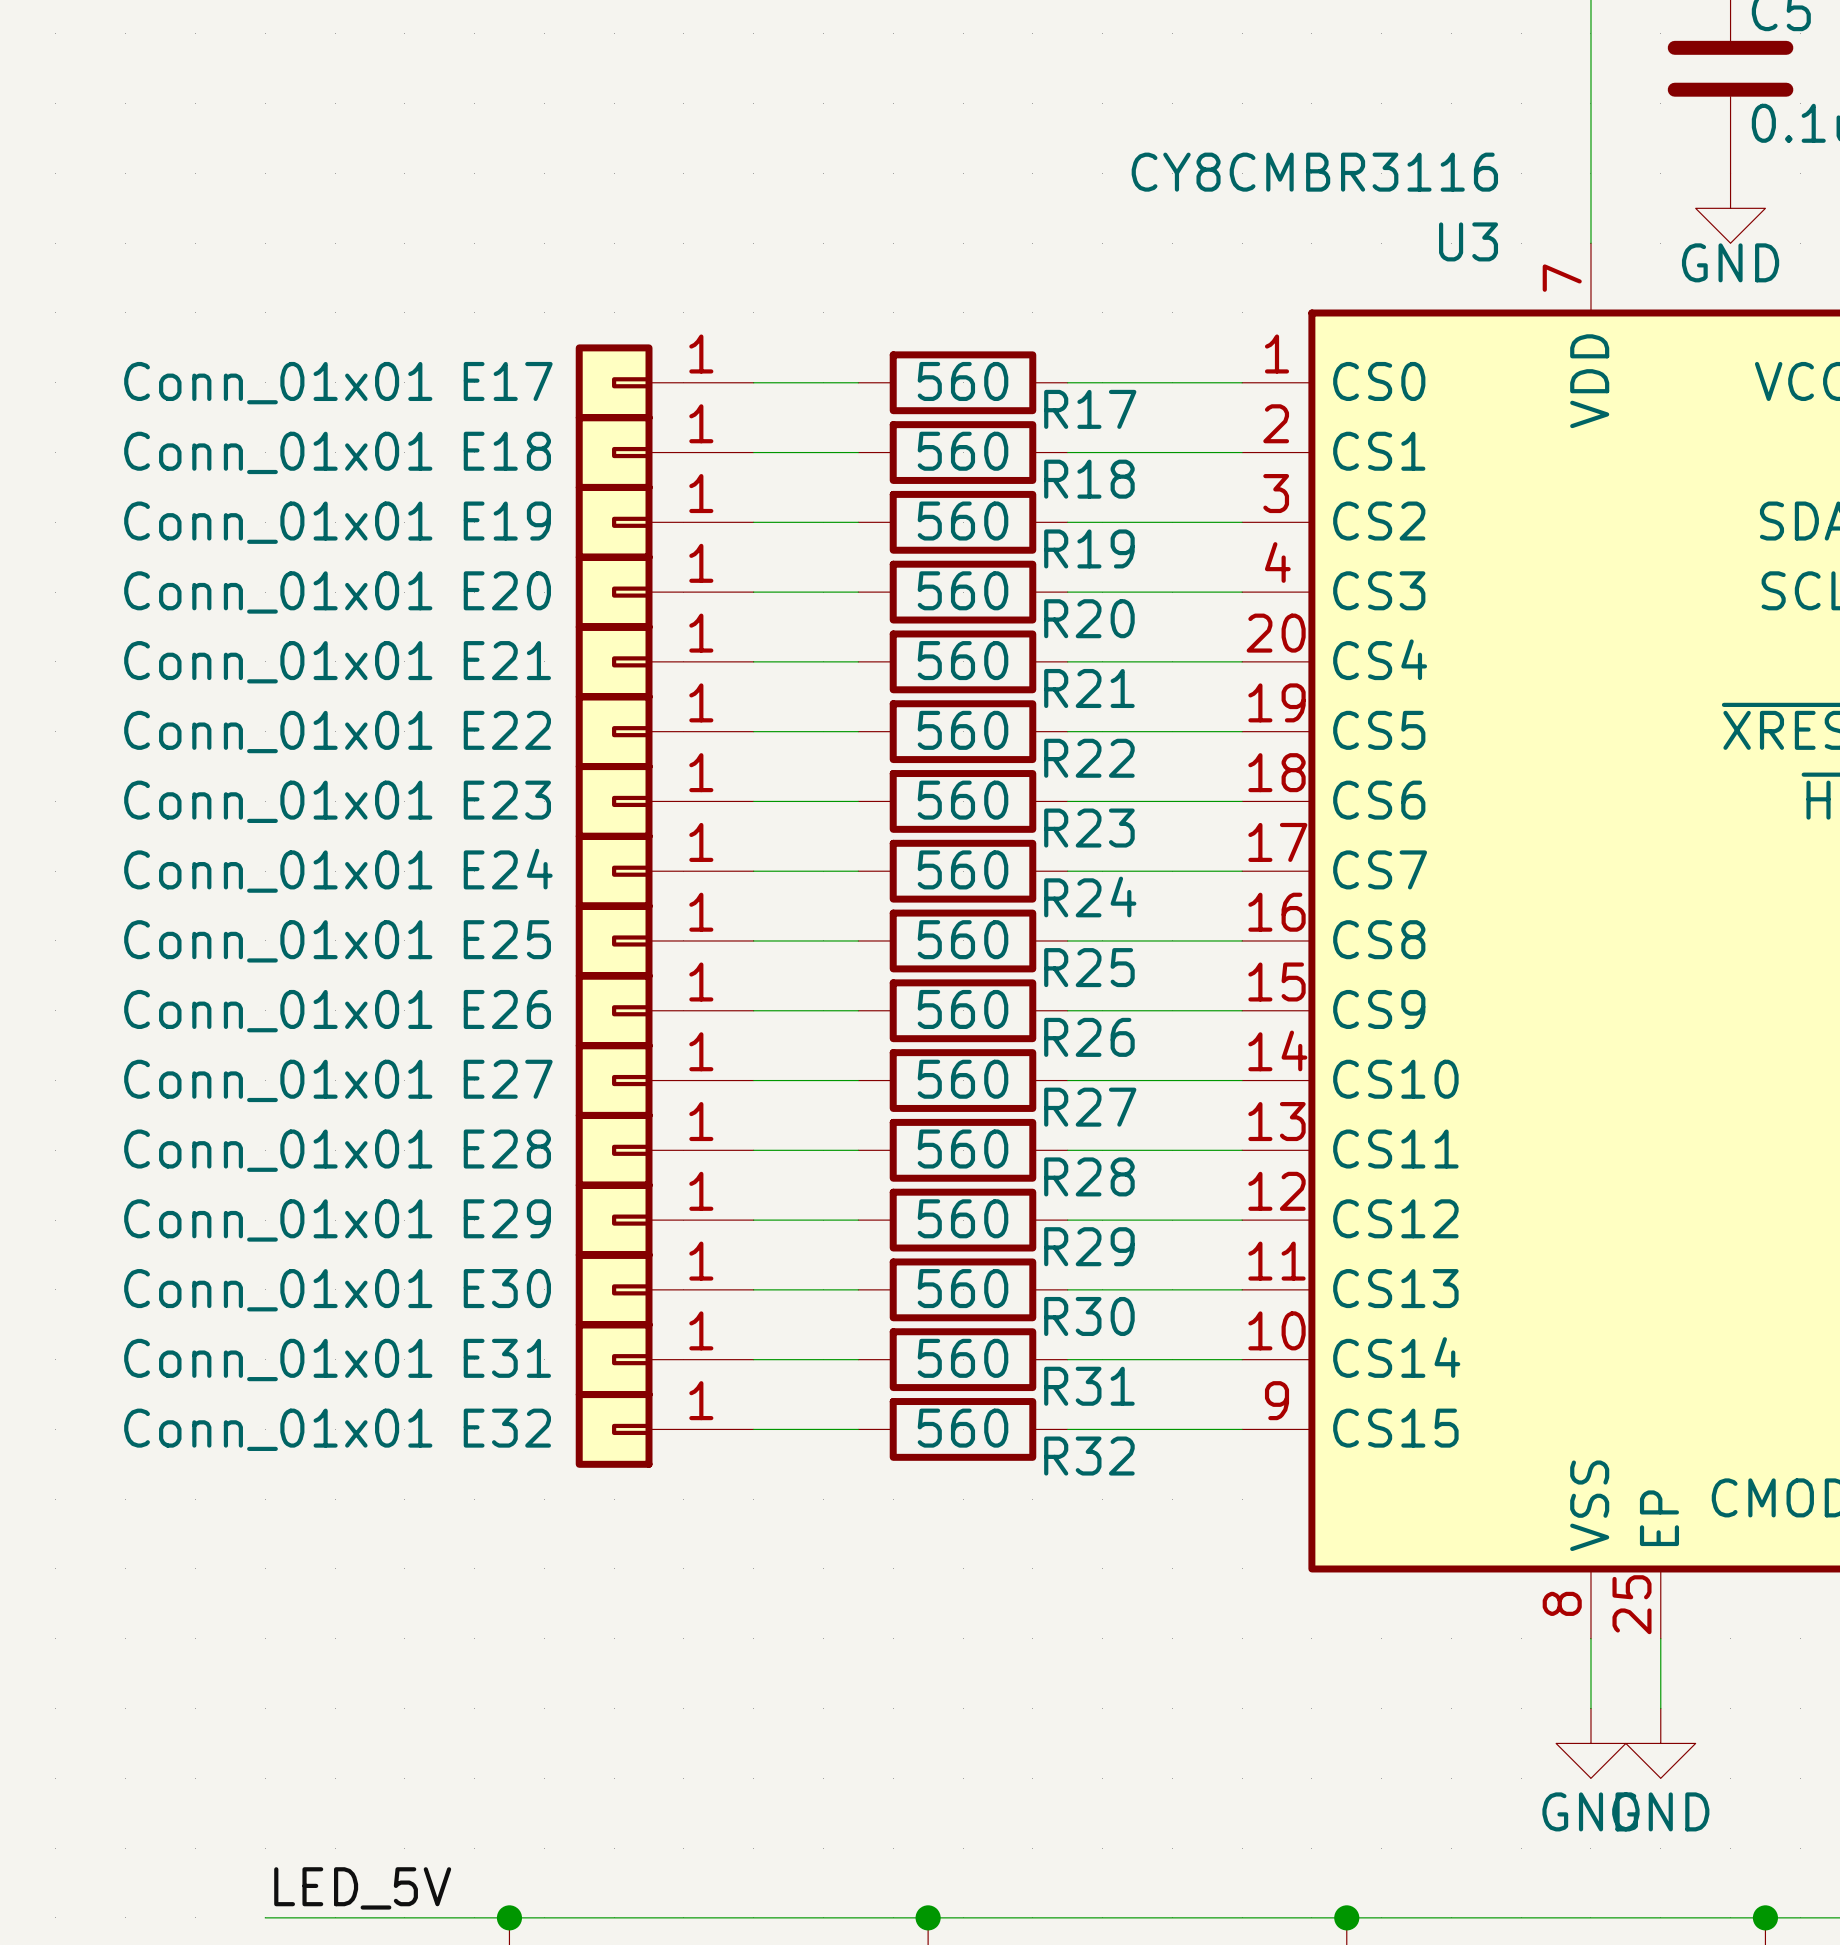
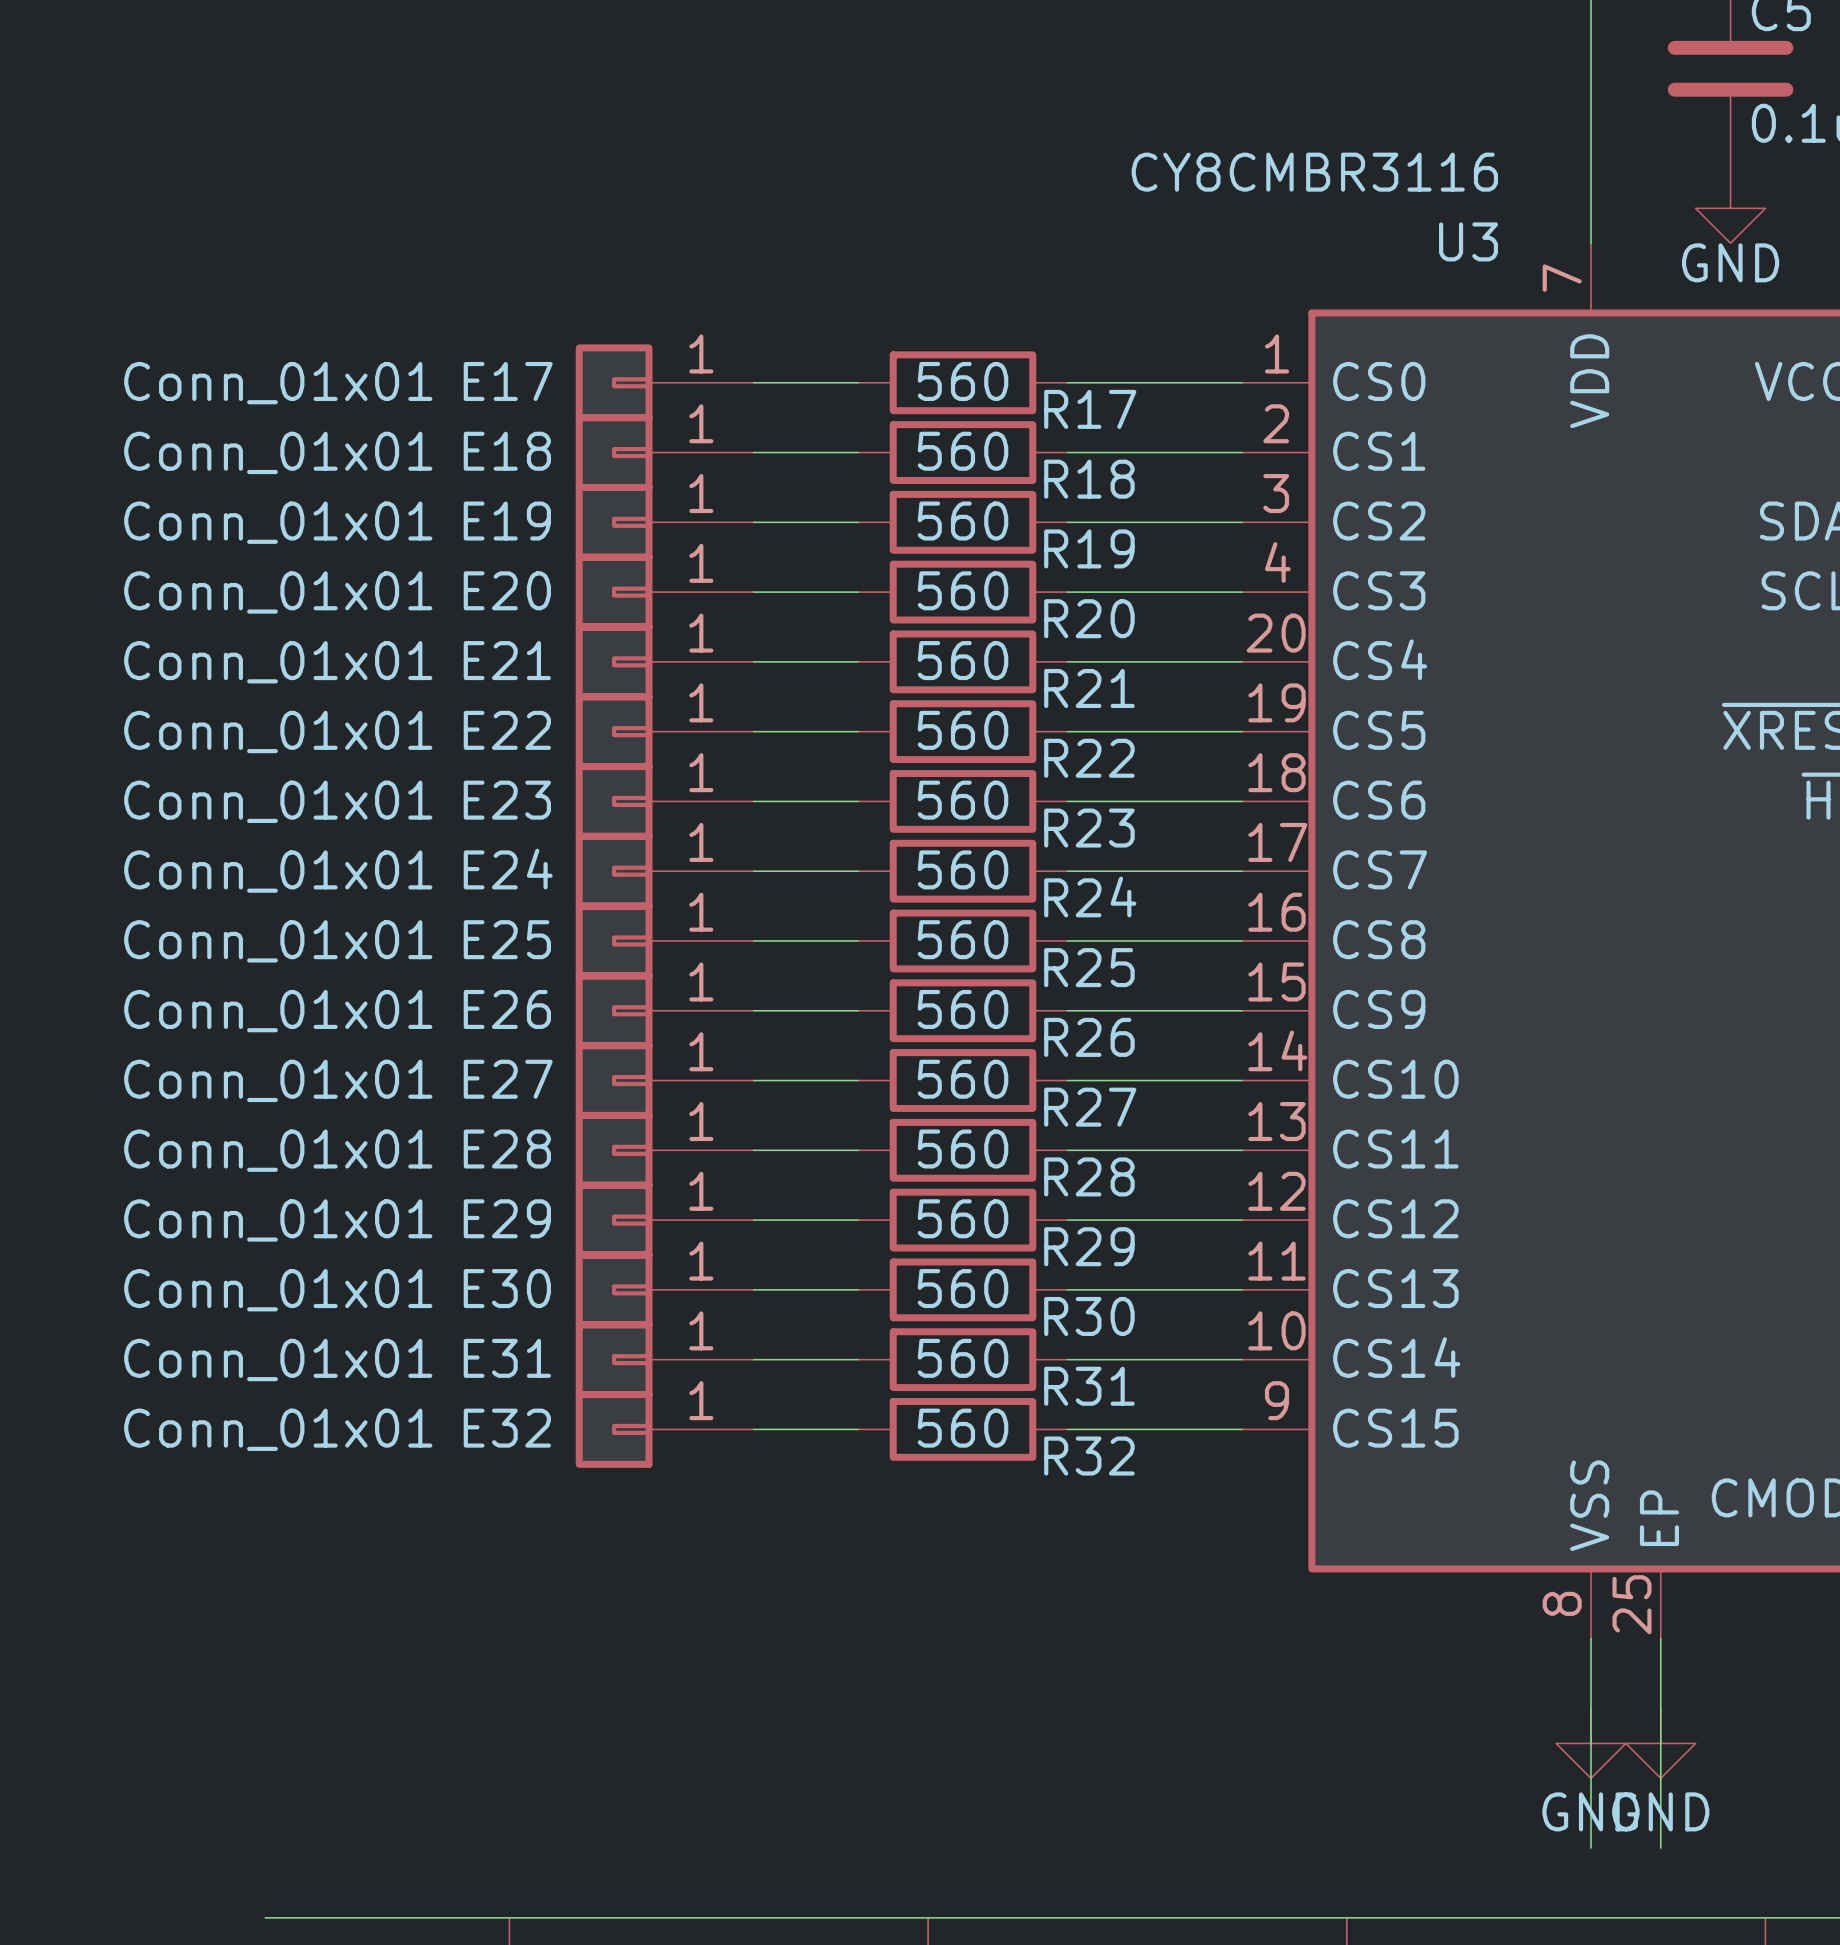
wire: none -> (1590, 1708) (1590, 1848)
wire: none -> (1660, 1708) (1660, 1848)
label: LED_5V (362, 1888) -> none
junction: (509, 1917) -> none
junction: (928, 1917) -> none
junction: (1346, 1917) -> none
junction: (1765, 1917) -> none

